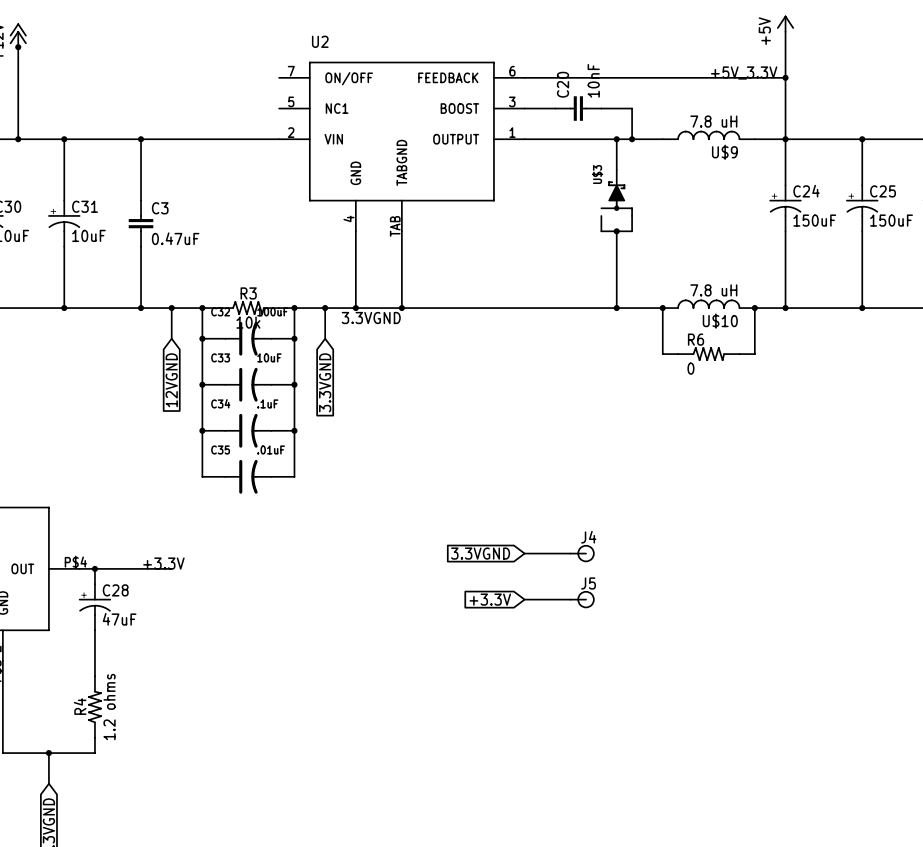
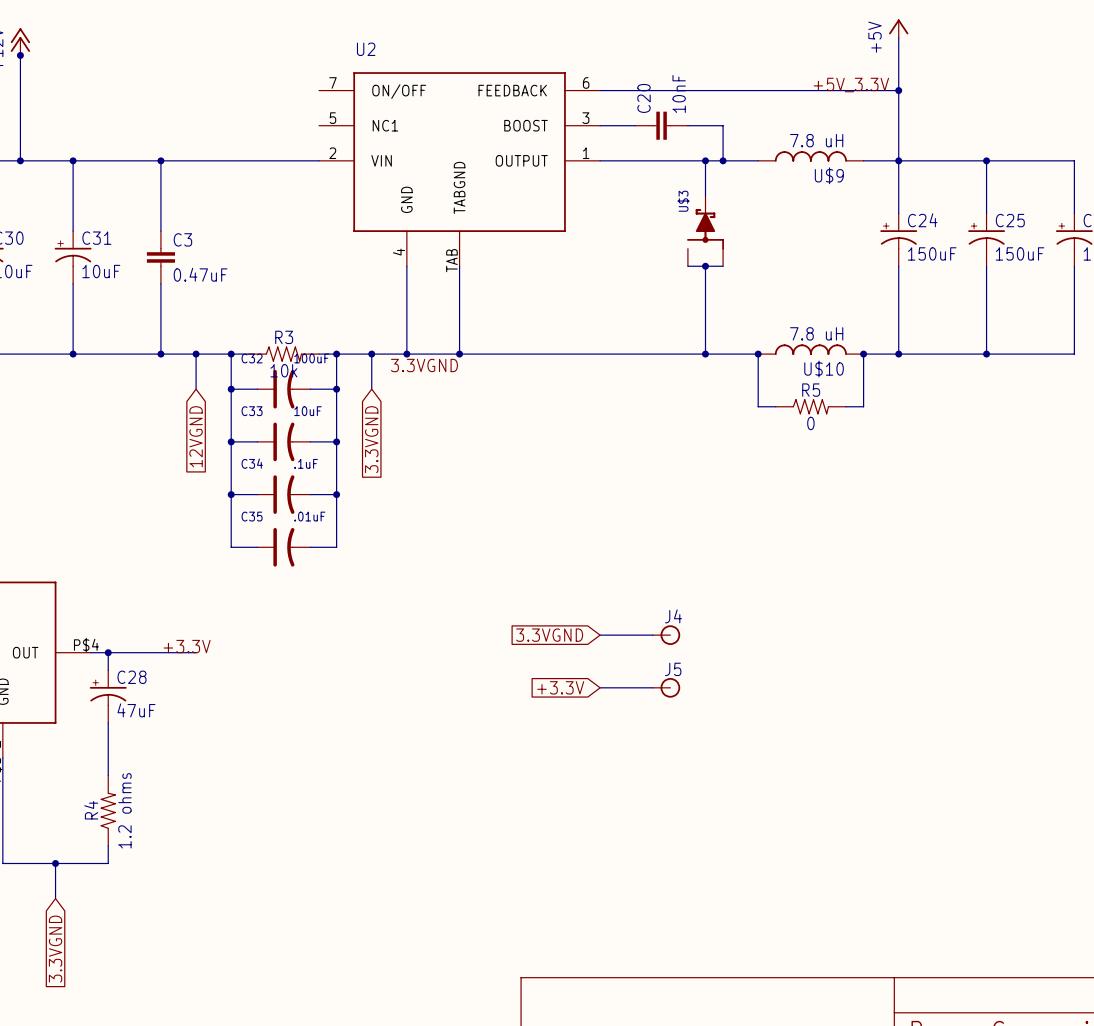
R6: 0 (708, 354) -> none
R5: none -> 0 (810, 406)

